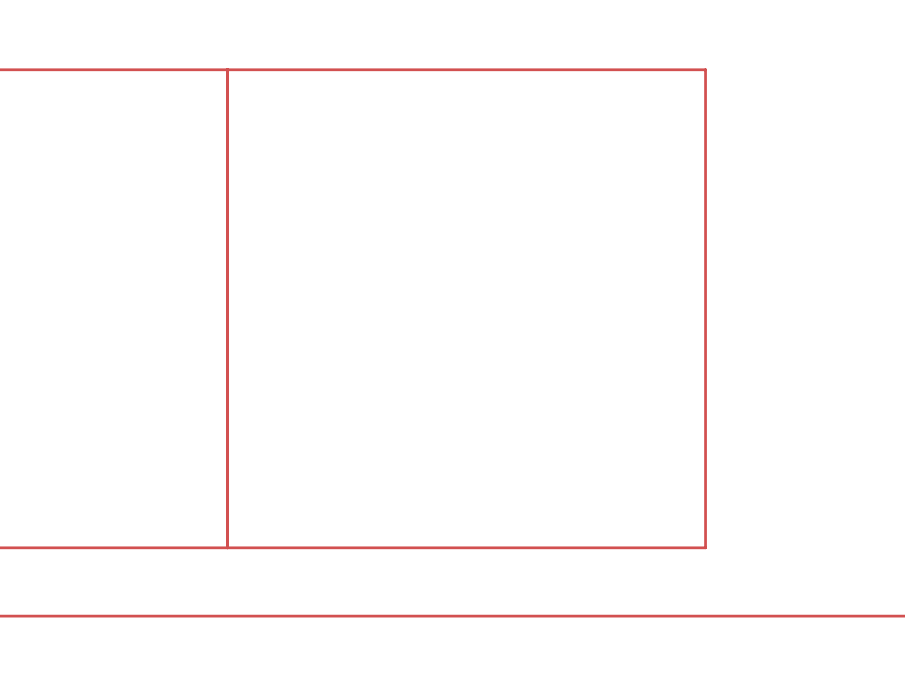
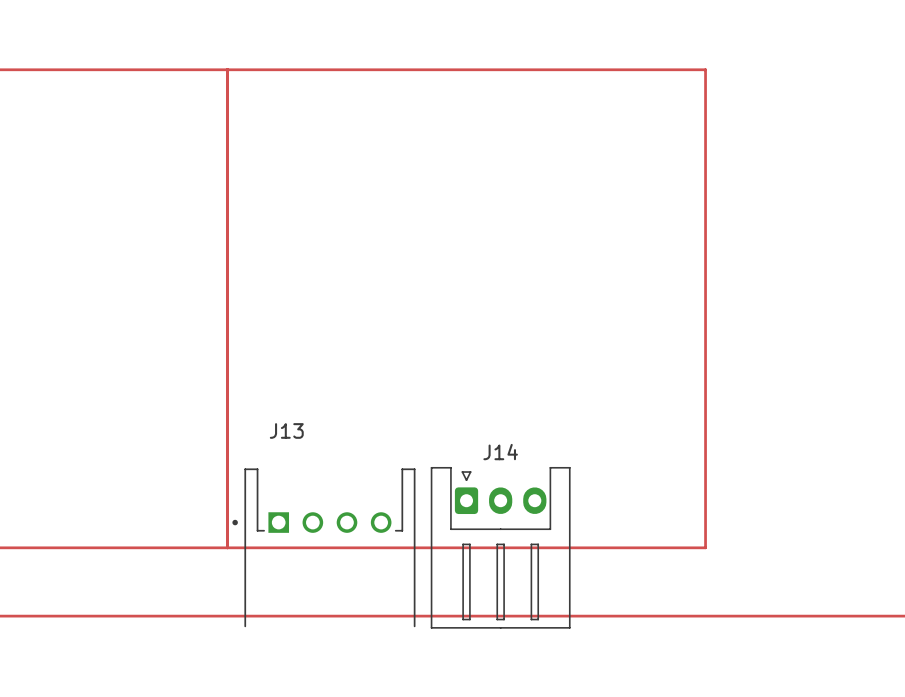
J13: none -> (323, 547)
J14: none -> (500, 547)

